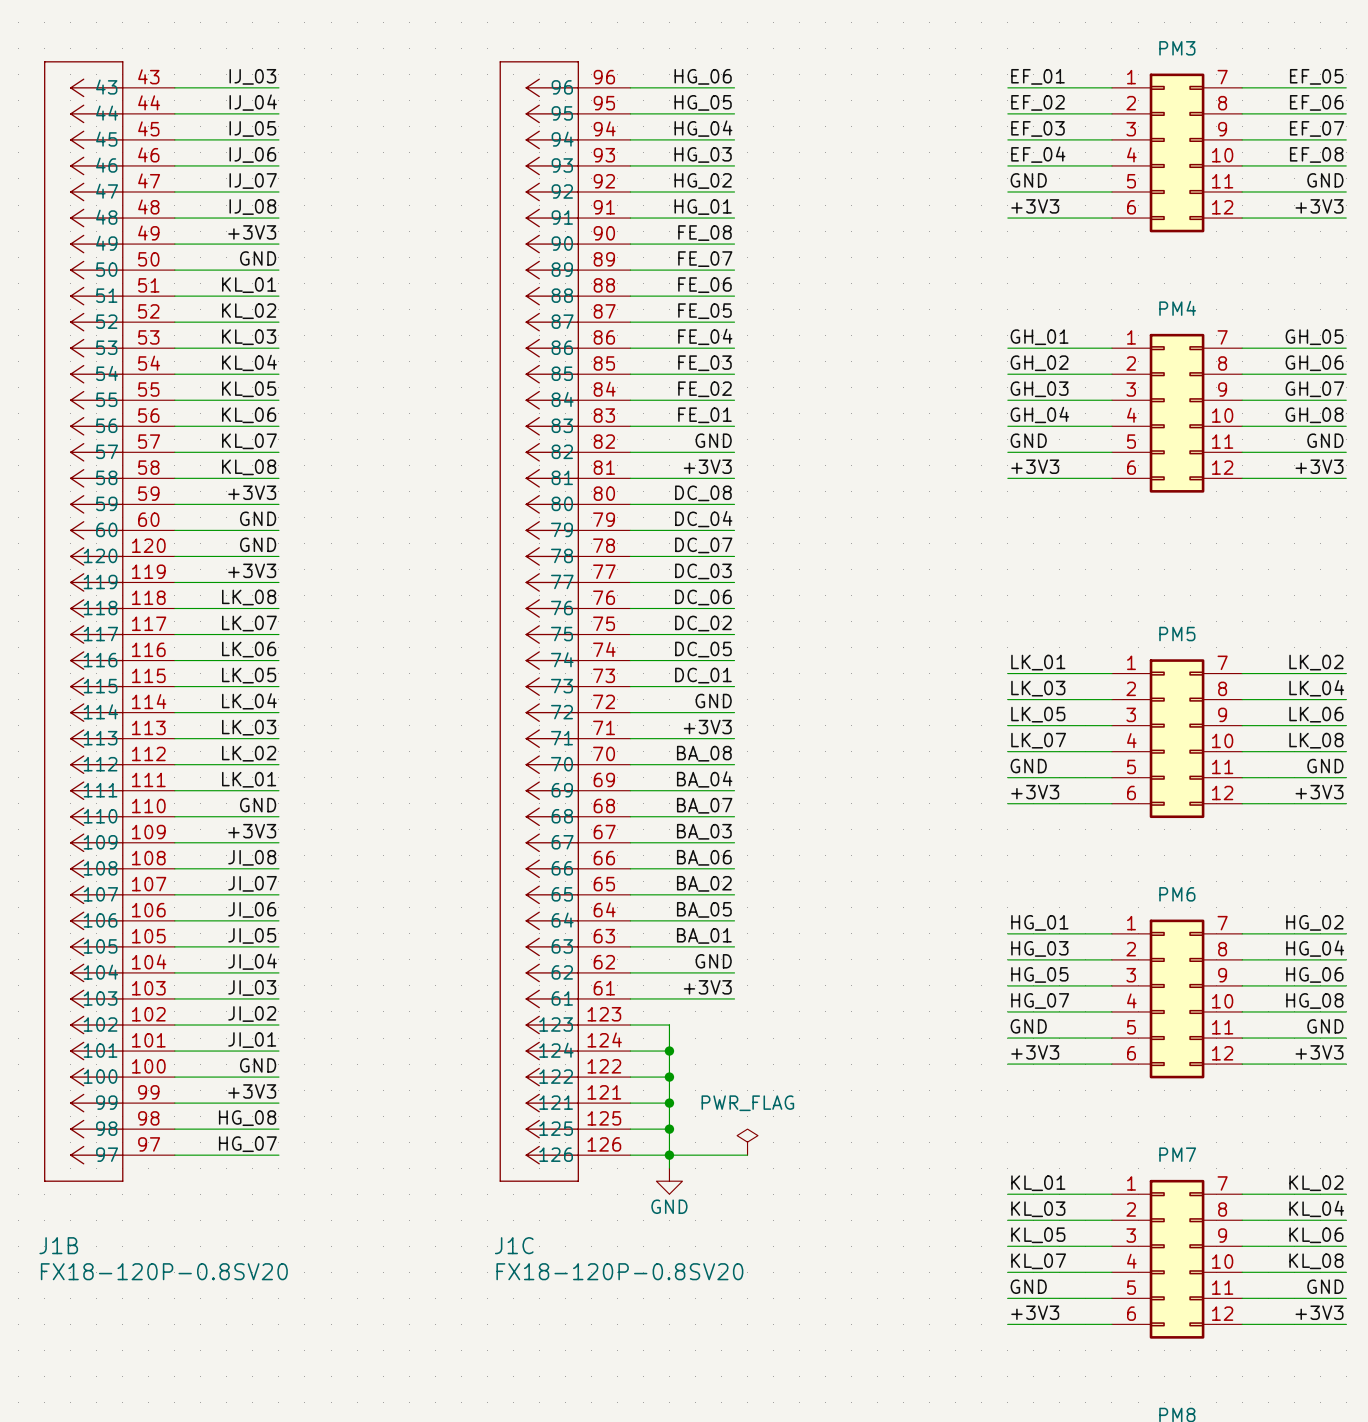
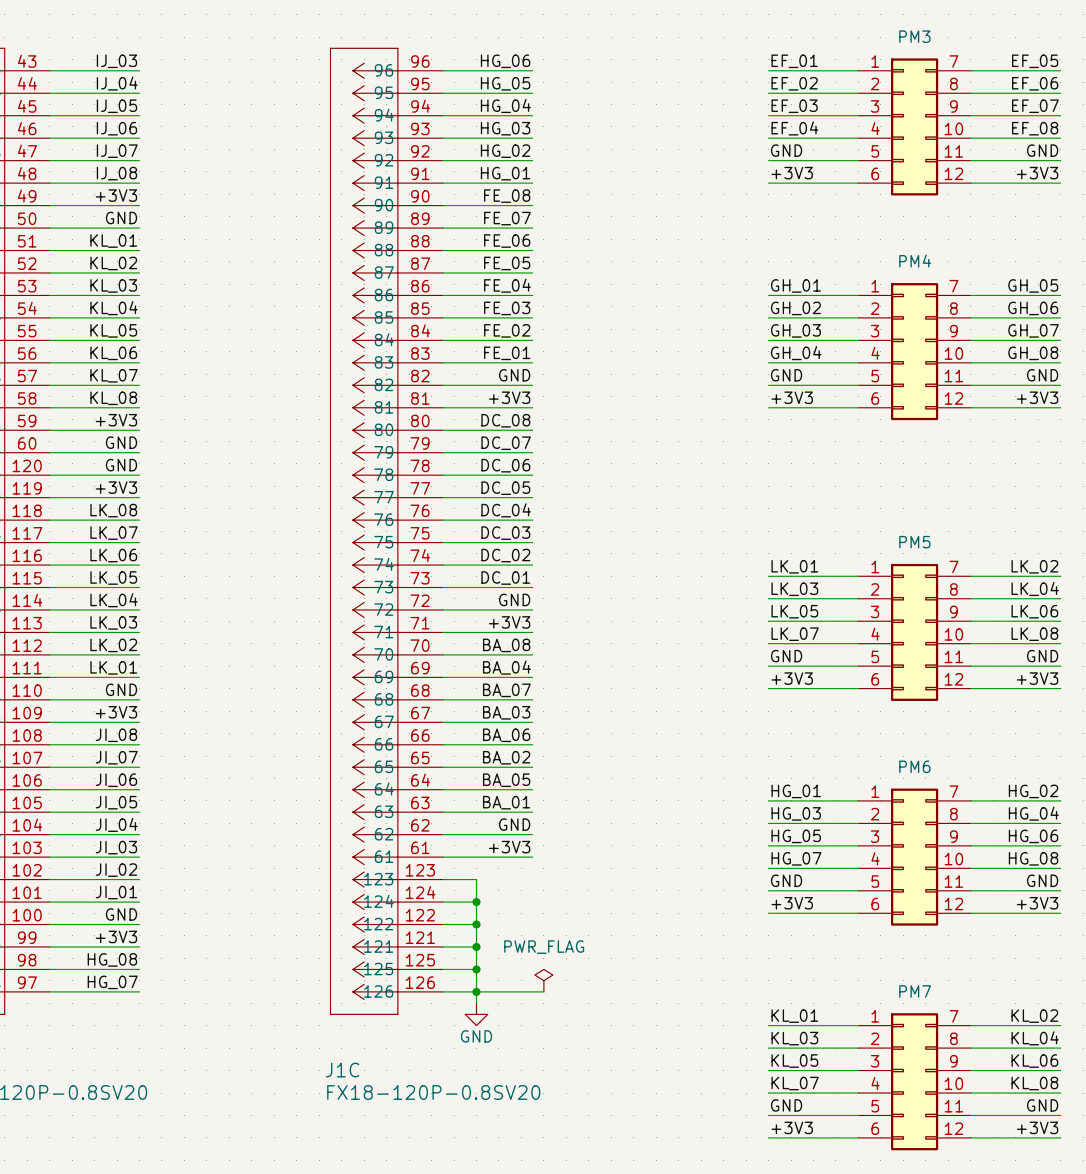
label: DC_04 (703, 519) -> DC_07 (506, 443)
label: DC_07 (703, 545) -> DC_06 (505, 465)
label: DC_03 (703, 571) -> DC_05 (505, 488)
label: DC_06 (703, 597) -> DC_04 (506, 510)
label: DC_02 (703, 623) -> DC_03 (505, 533)
label: DC_05 (703, 649) -> DC_02 (505, 555)

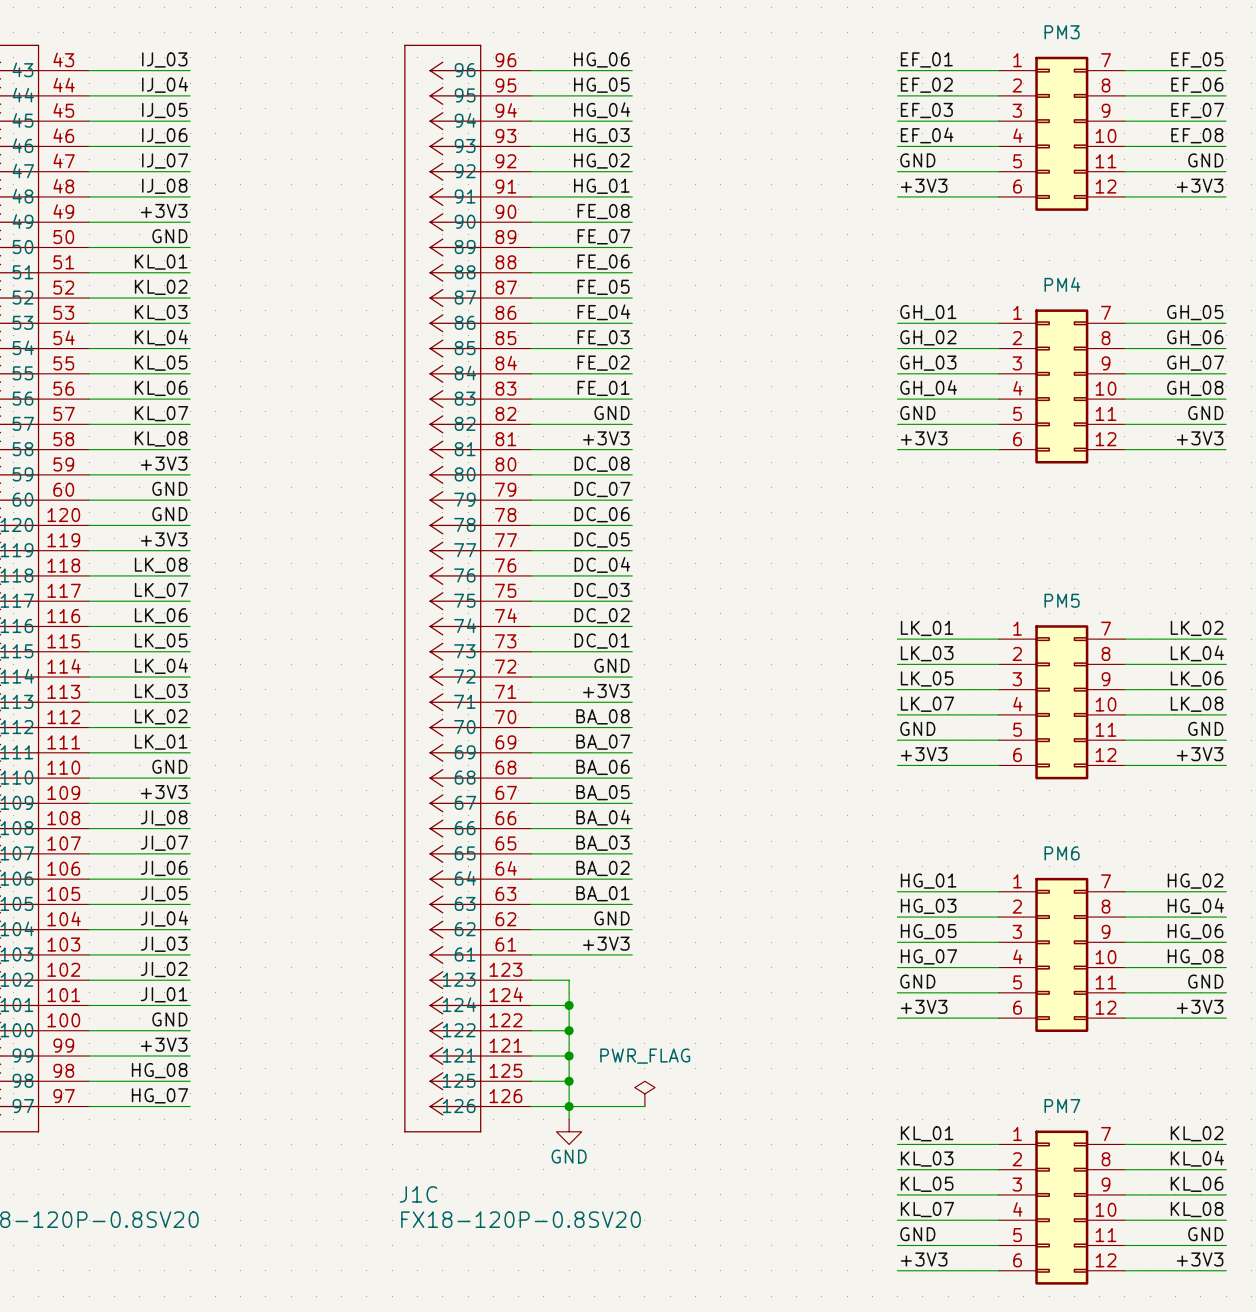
label: BA_04 (506, 667) -> BA_07 (603, 742)
label: BA_07 (506, 690) -> BA_06 (603, 767)
label: BA_03 (506, 712) -> BA_05 (603, 792)
label: BA_06 (506, 735) -> BA_04 (603, 817)
label: BA_02 (506, 757) -> BA_03 (603, 843)
label: BA_05 (506, 780) -> BA_02 (603, 868)

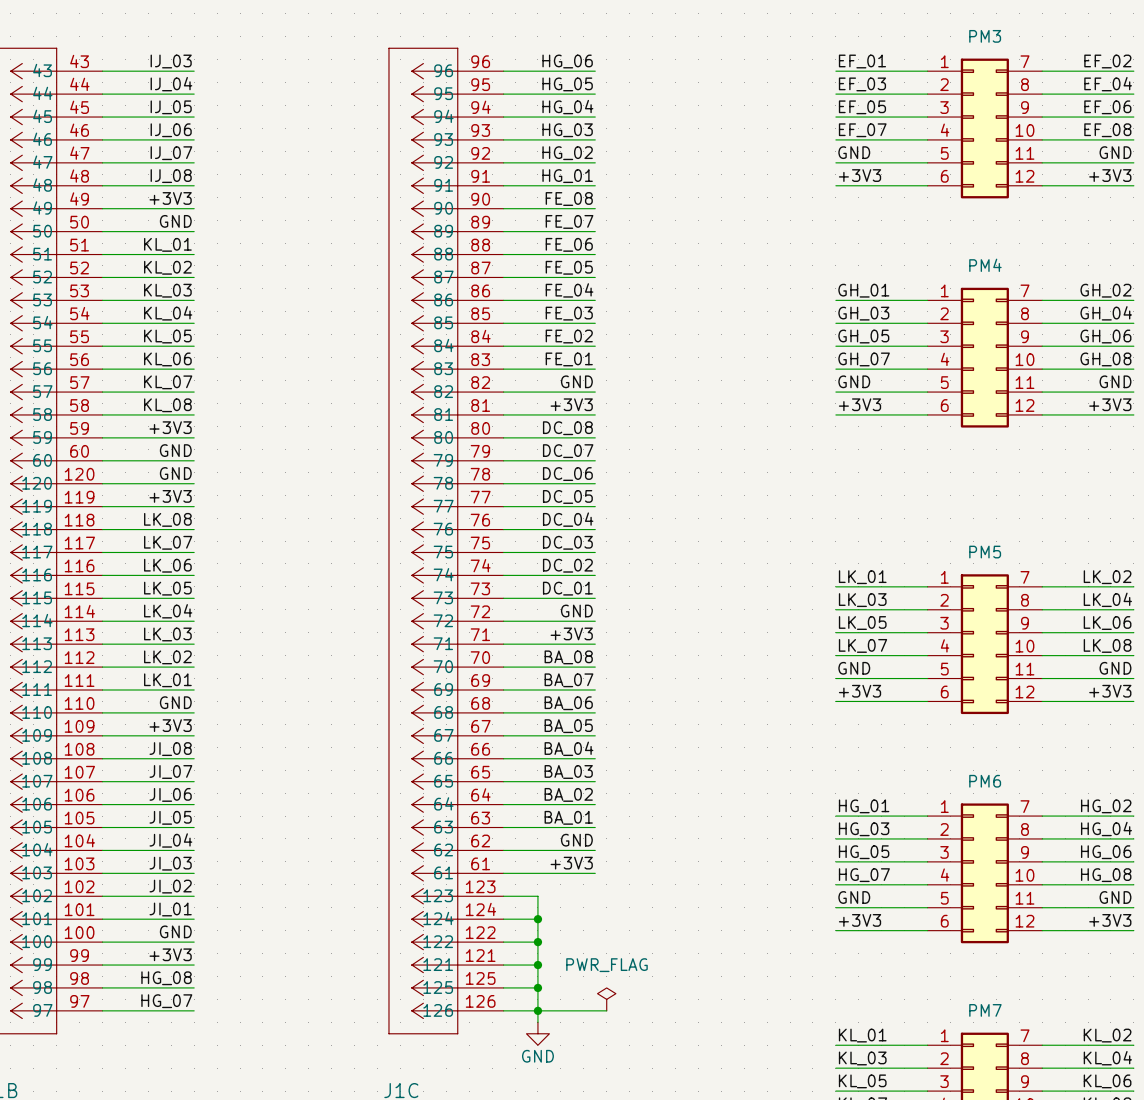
label: EF_05 (1197, 59) -> EF_02 (1107, 61)
label: EF_02 (926, 85) -> EF_03 (862, 84)
label: EF_06 (1197, 85) -> EF_04 (1108, 84)
label: EF_03 (926, 110) -> EF_05 (862, 107)
label: EF_07 (1197, 110) -> EF_06 (1107, 107)
label: EF_04 (927, 135) -> EF_07 (862, 130)
label: GH_05 (1195, 312) -> GH_02 (1105, 290)
label: GH_02 (928, 337) -> GH_03 (863, 313)
label: GH_06 (1195, 337) -> GH_04 (1106, 313)
label: GH_03 (928, 363) -> GH_05 (863, 336)
label: GH_07 (1195, 363) -> GH_06 (1105, 336)
label: GH_04 (928, 388) -> GH_07 (864, 359)

